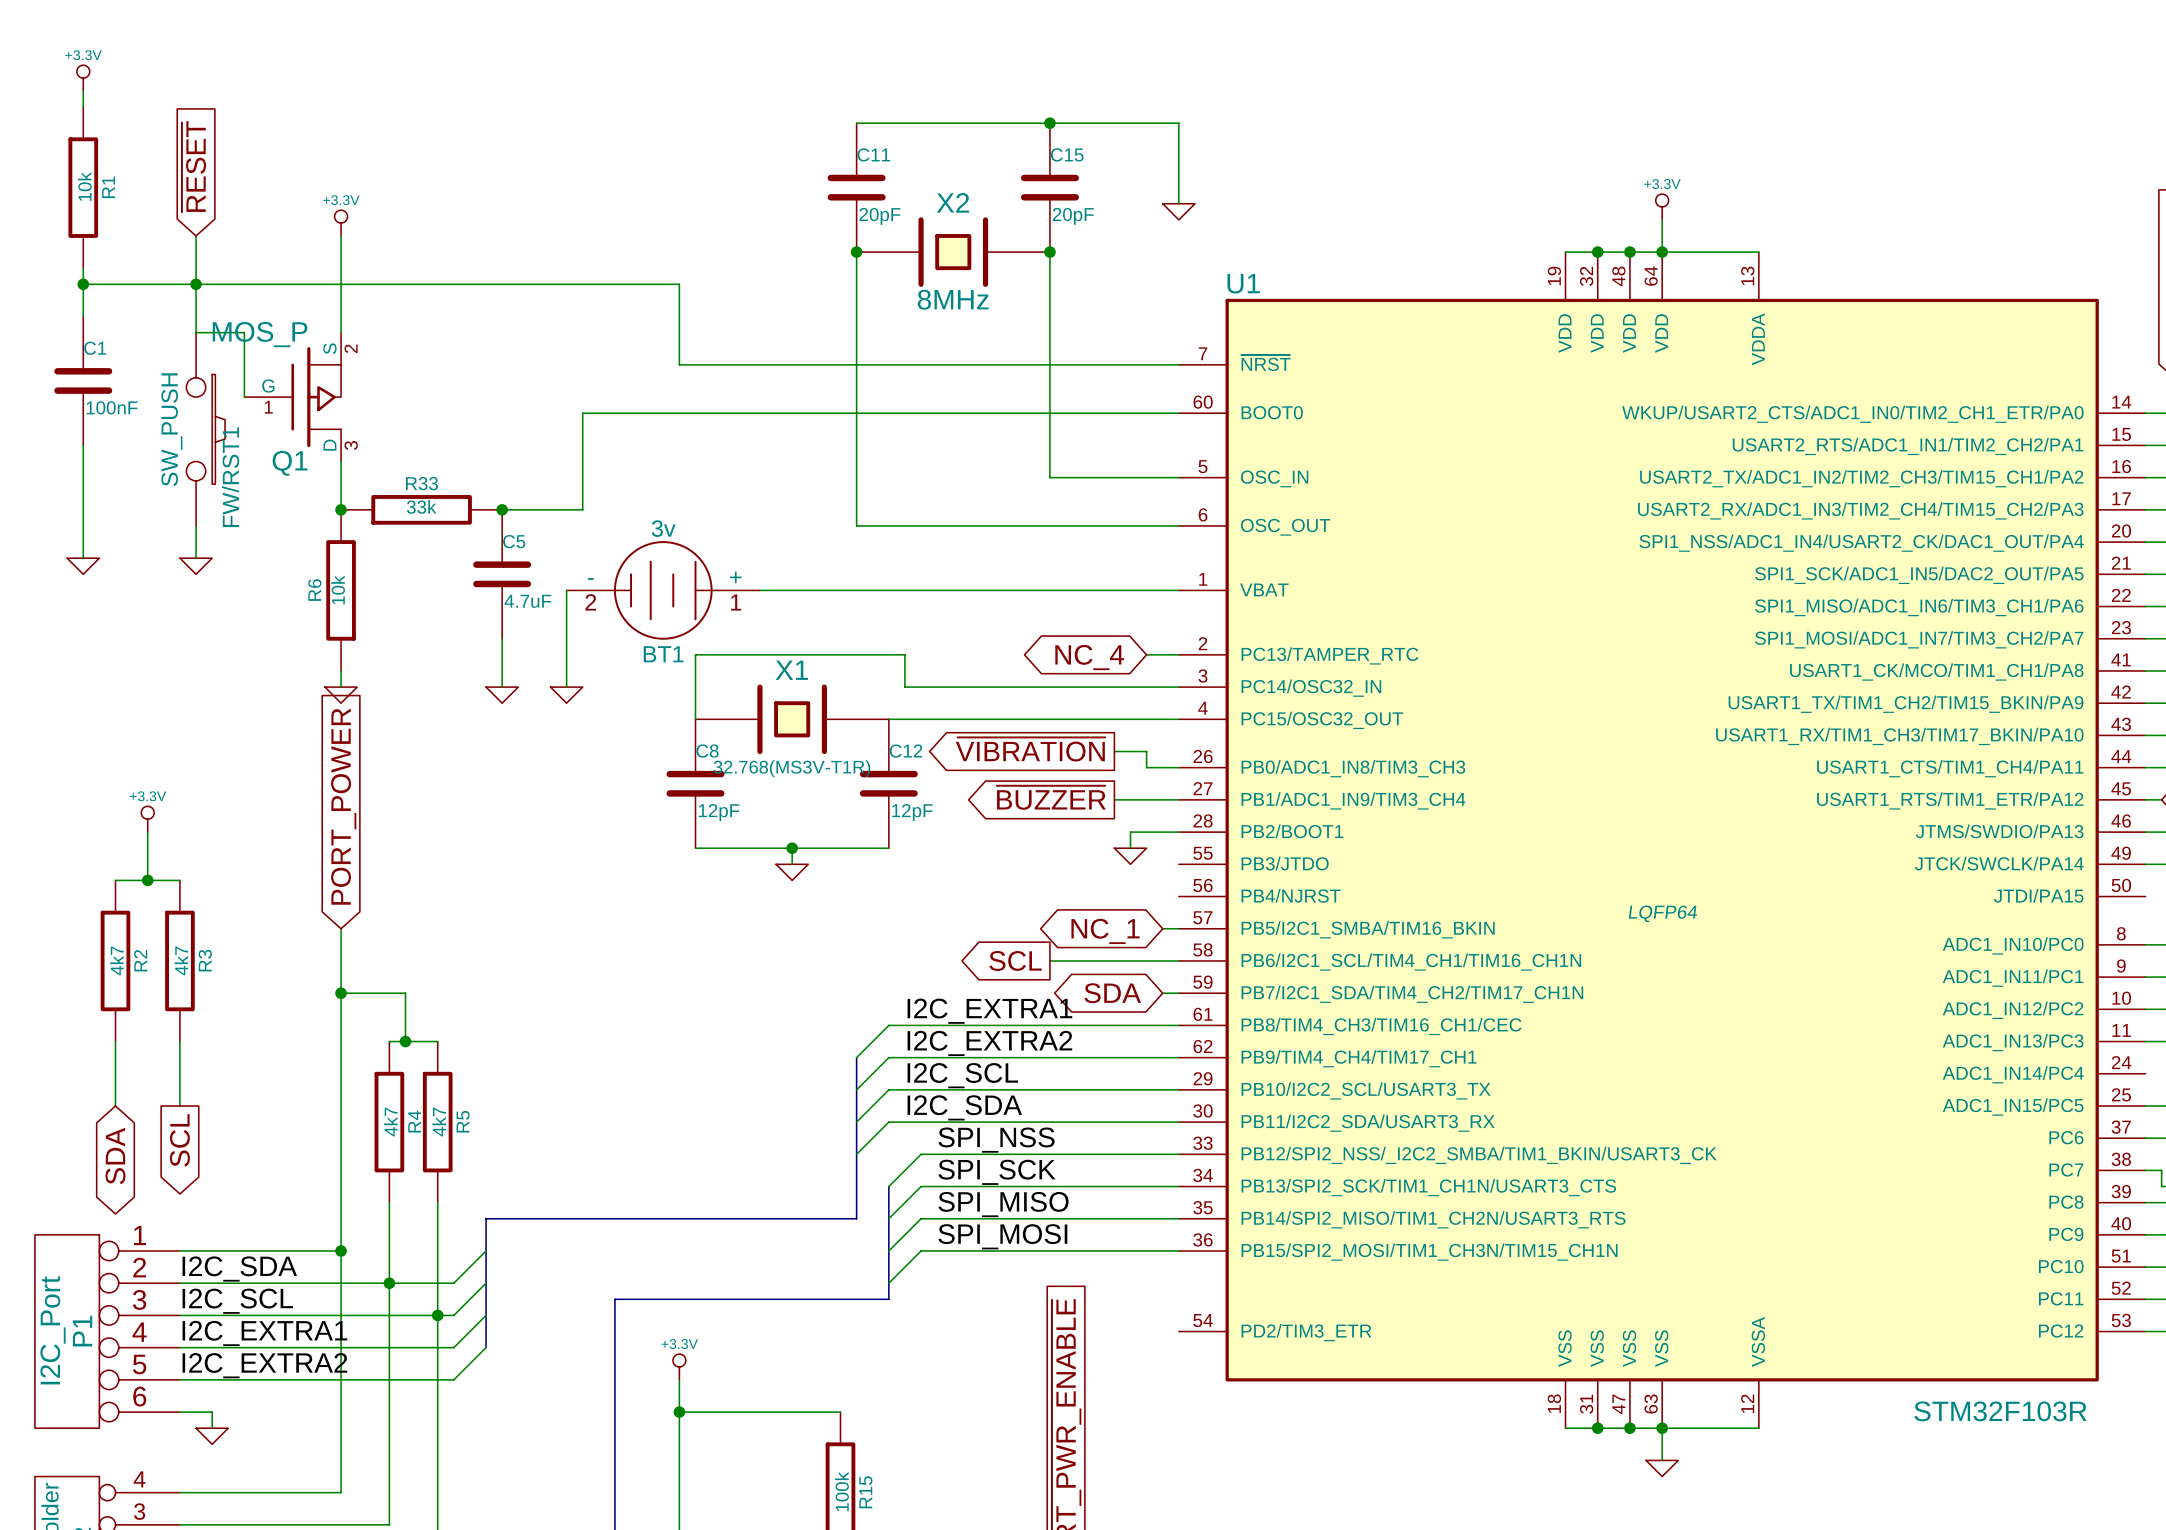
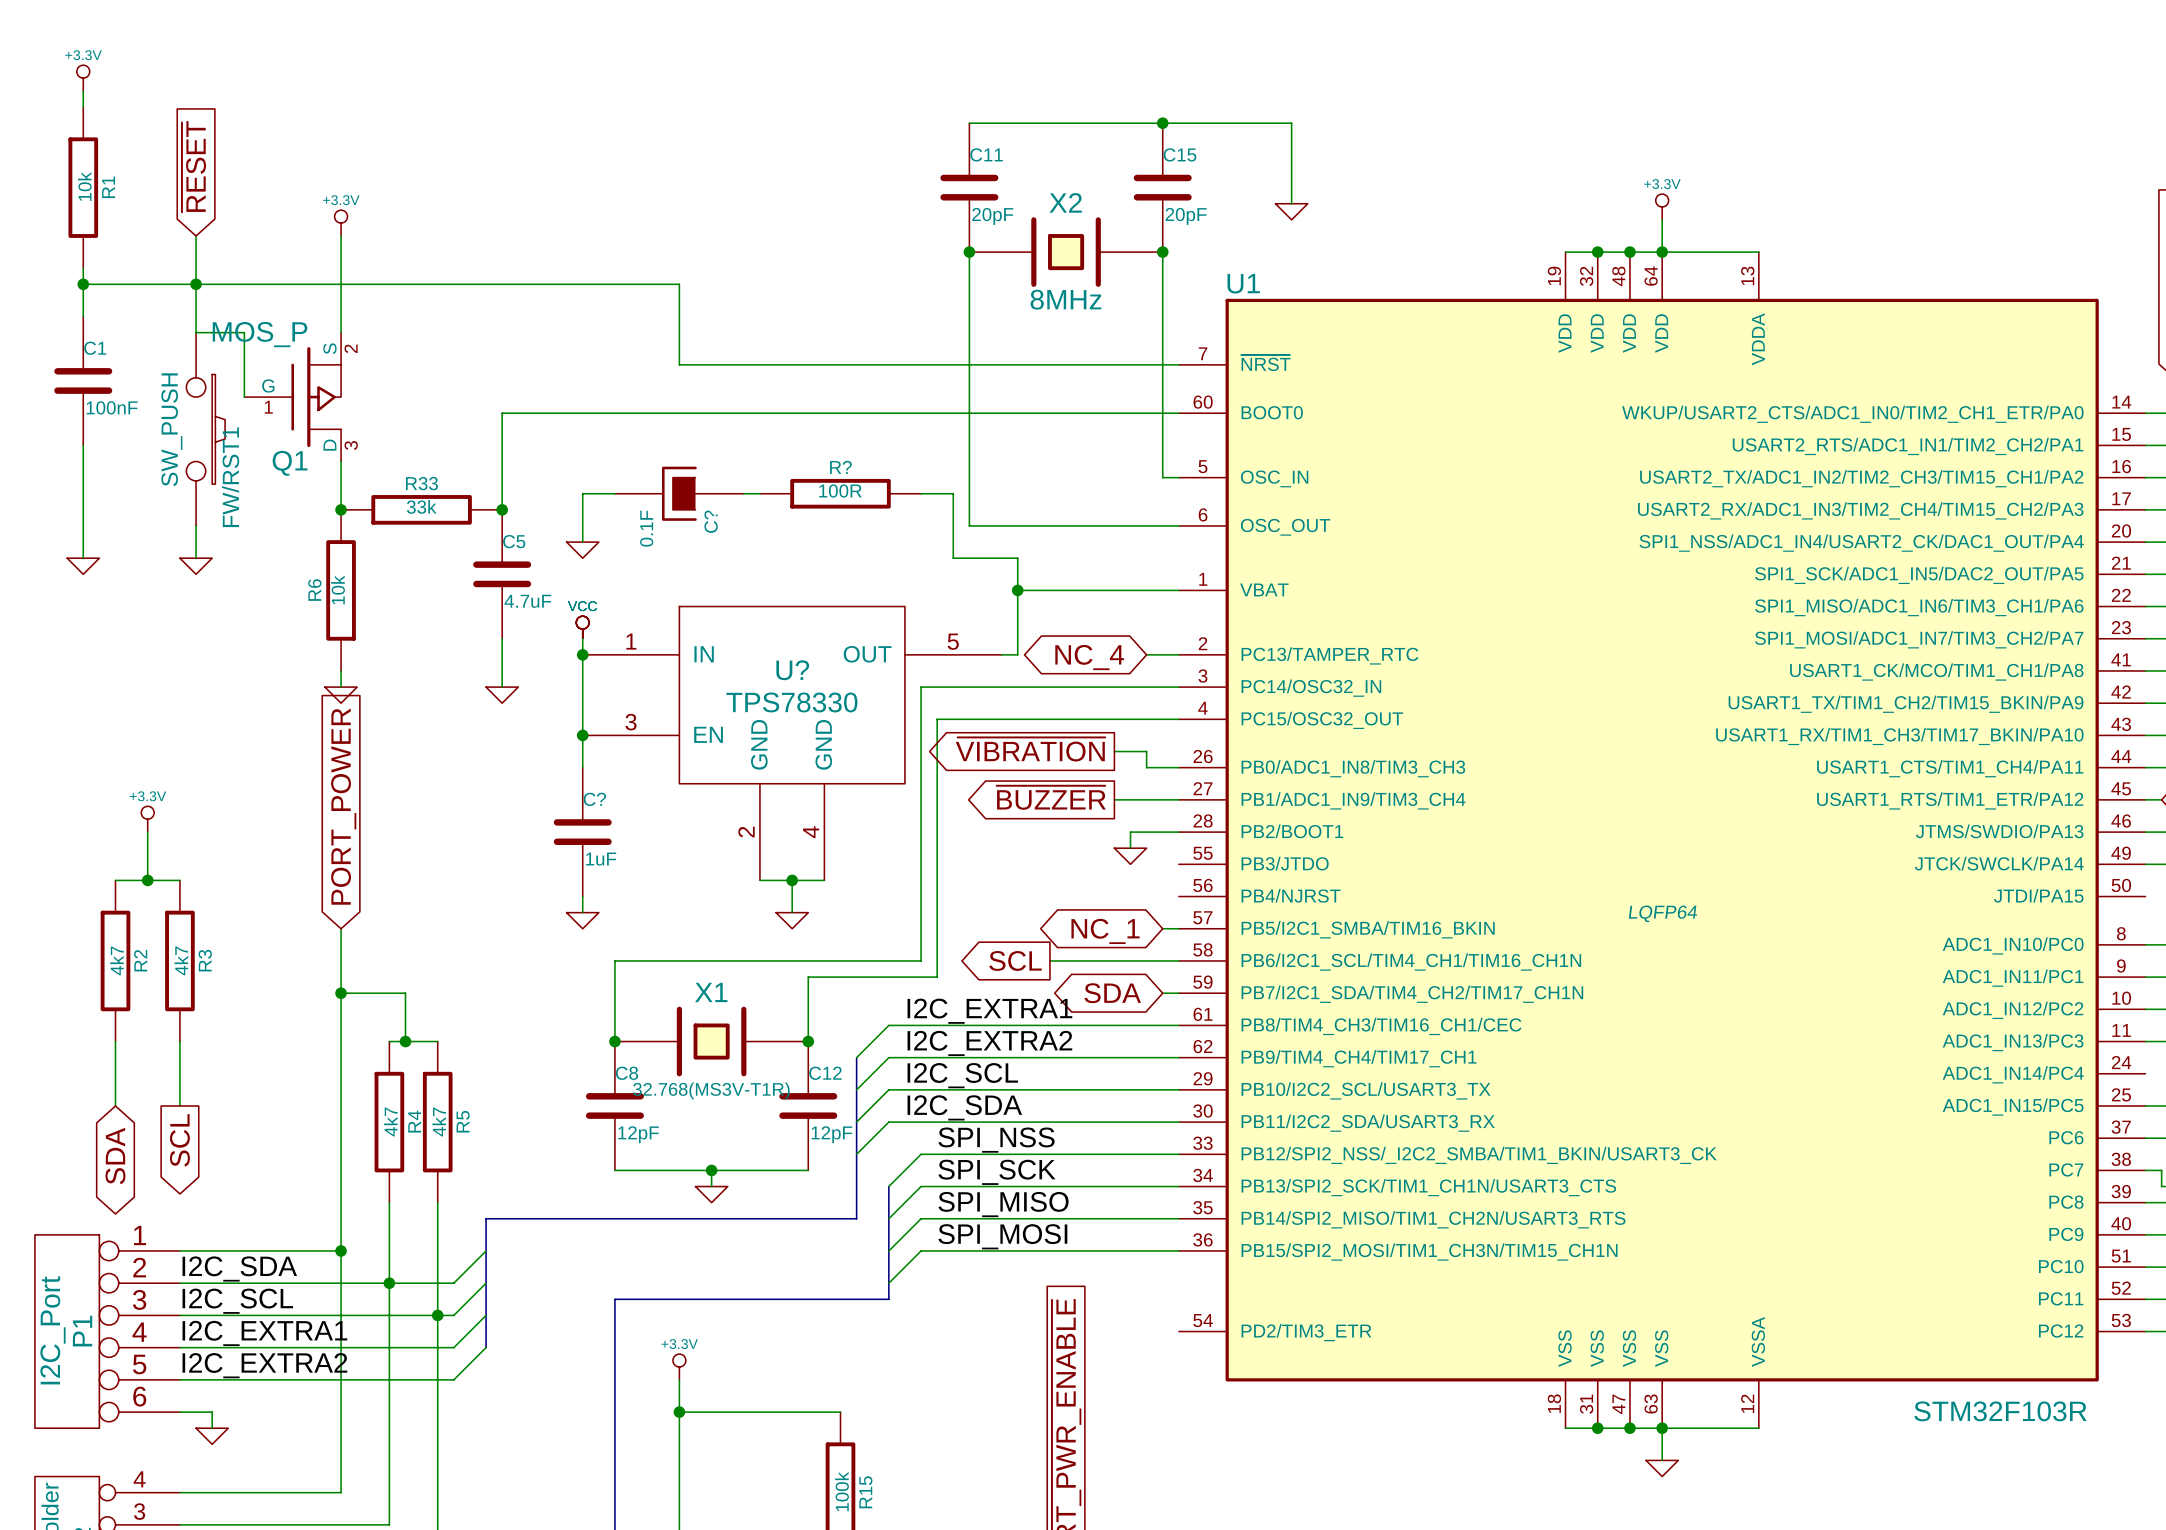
wire: (856, 123) (969, 123) -> none
junction: (1049, 123) -> none
junction: none -> (1162, 123)
wire: (1178, 123) (1178, 203) -> (1178, 123) (1291, 123) (1291, 203)
C11 position: (856, 187) -> (969, 187)
C15 position: (1049, 187) -> (1162, 187)
power symbol position: (1178, 211) -> (1291, 211)
wire: (856, 252) (856, 525) (969, 525) -> (969, 252) (969, 525)
junction: (856, 252) -> none
X2 position: (953, 252) -> (1066, 252)
junction: none -> (969, 252)
wire: (1049, 252) (1049, 477) (1162, 477) -> (1162, 252) (1162, 477)
junction: (1049, 252) -> none
junction: none -> (1162, 252)
wire: (582, 413) (582, 493) -> (582, 413) (502, 413) (502, 509)
wire: none -> (582, 493) (614, 493)
C?: none -> 0.1F (679, 493)
wire: none -> (743, 493) (759, 493)
R?: none -> 100R (840, 493)
wire: none -> (921, 493) (953, 493) (953, 558) (1017, 558) (1017, 654) (1001, 654)
wire: (502, 509) (582, 509) -> (582, 542) (582, 509)
power symbol: none -> (582, 550)
wire: (566, 590) (566, 687) -> none
BT1: 3v (663, 590) -> none
wire: (759, 590) (1017, 590) -> none
junction: none -> (1017, 590)
power symbol: none -> VCC (582, 627)
wire: none -> (582, 638) (582, 767)
junction: none -> (582, 654)
wire: (921, 687) (904, 687) (904, 654) (695, 654) (695, 719) -> (921, 687) (921, 960) (614, 960) (614, 1041)
power symbol: (566, 695) -> none
X1 position: (792, 719) -> (711, 1041)
wire: (888, 719) (937, 719) -> (808, 1041) (808, 977) (937, 977) (937, 719)
junction: none -> (582, 735)
U?: none -> TPS78330 (792, 743)
C8 position: (695, 783) -> (614, 1105)
C12 position: (888, 783) -> (808, 1105)
C?: none -> 1uF (582, 832)
wire: (695, 848) (888, 848) -> none
wire: (792, 848) (792, 864) -> (582, 896) (582, 912)
junction position: (792, 848) -> (792, 880)
power symbol position: (792, 872) -> (792, 920)
wire: none -> (759, 880) (824, 880)
wire: none -> (792, 880) (792, 912)
power symbol: none -> (582, 920)
junction: none -> (614, 1041)
junction: none -> (808, 1041)
wire: none -> (614, 1170) (808, 1170)
wire: none -> (711, 1170) (711, 1186)
junction: none -> (711, 1170)
power symbol: none -> (711, 1194)

